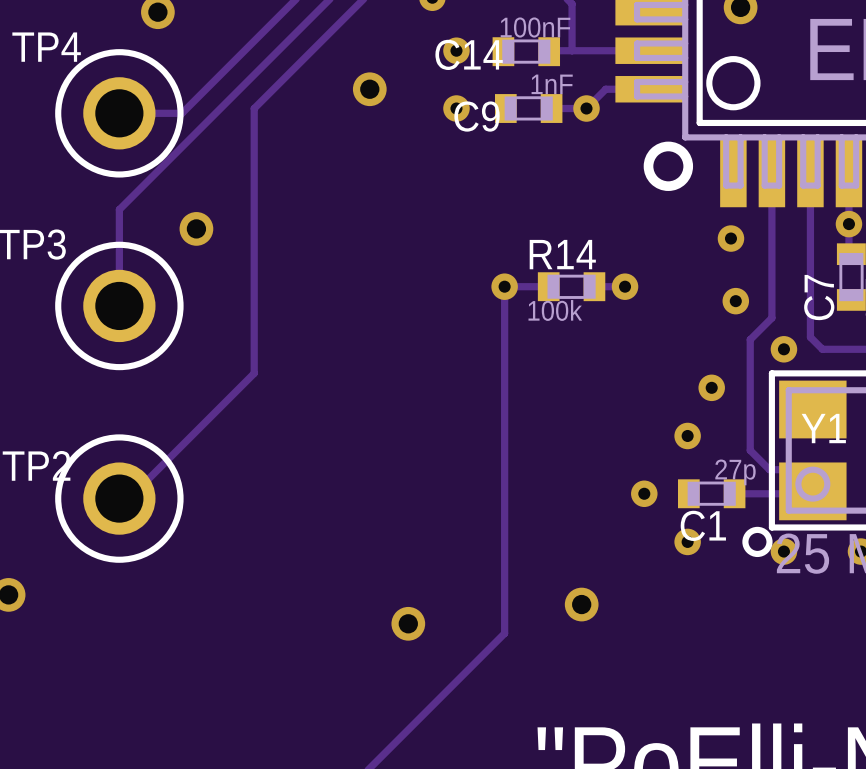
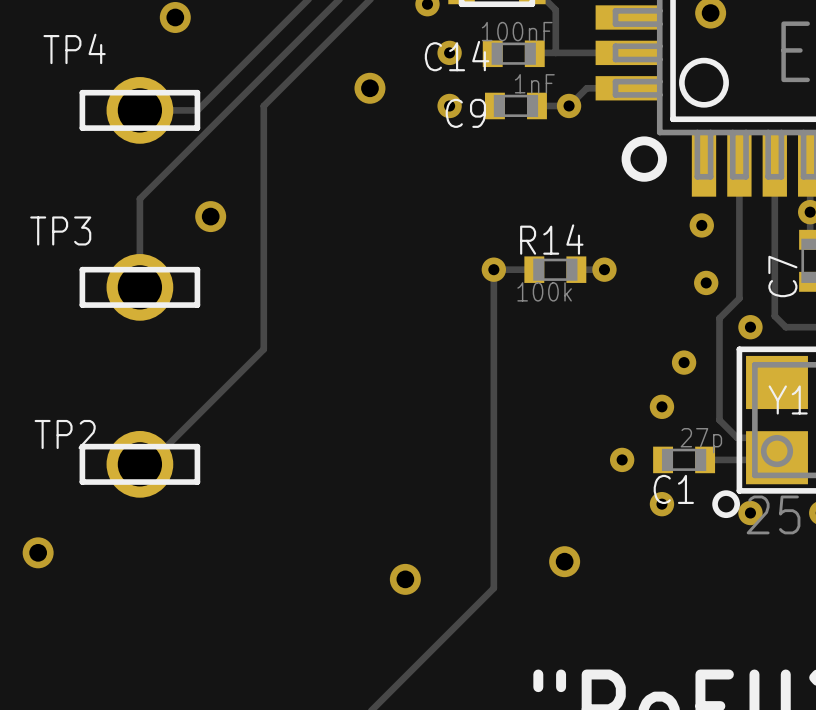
TP4 footprint: [55, 49, 184, 178] -> [79, 77, 201, 144]
TP3 footprint: [55, 241, 184, 371] -> [79, 254, 201, 321]
TP2 footprint: [55, 434, 184, 563] -> [79, 430, 201, 498]

